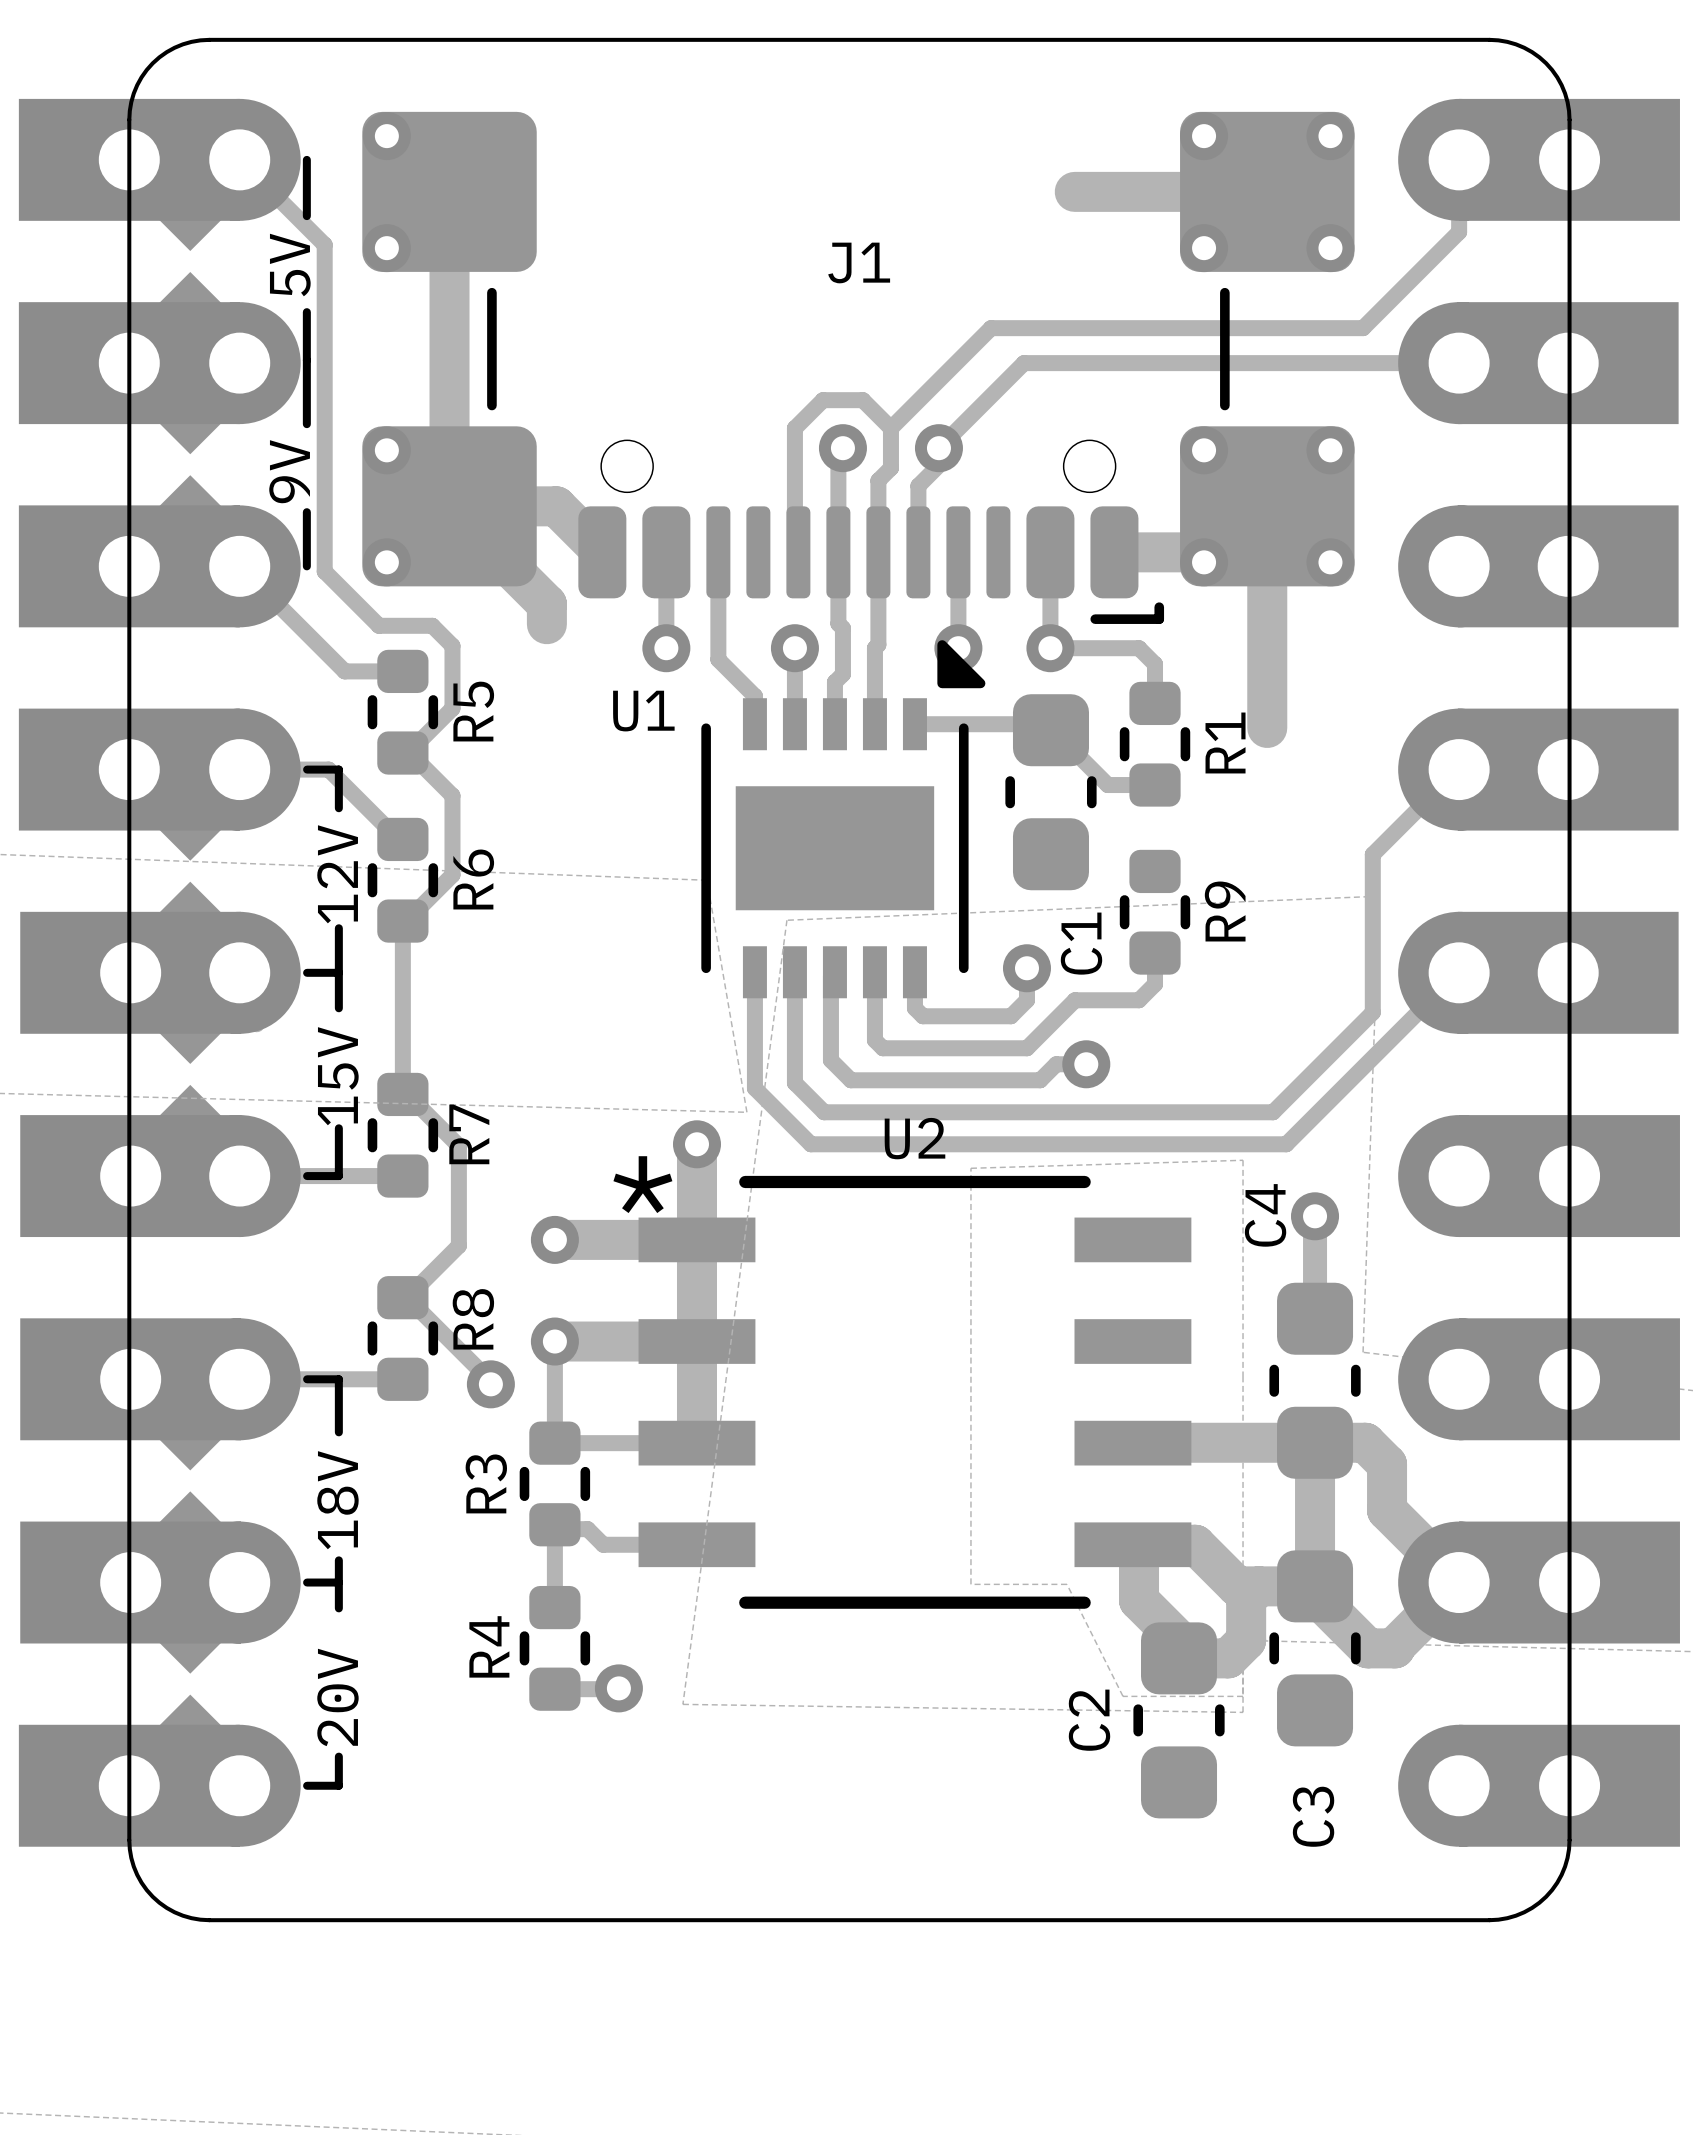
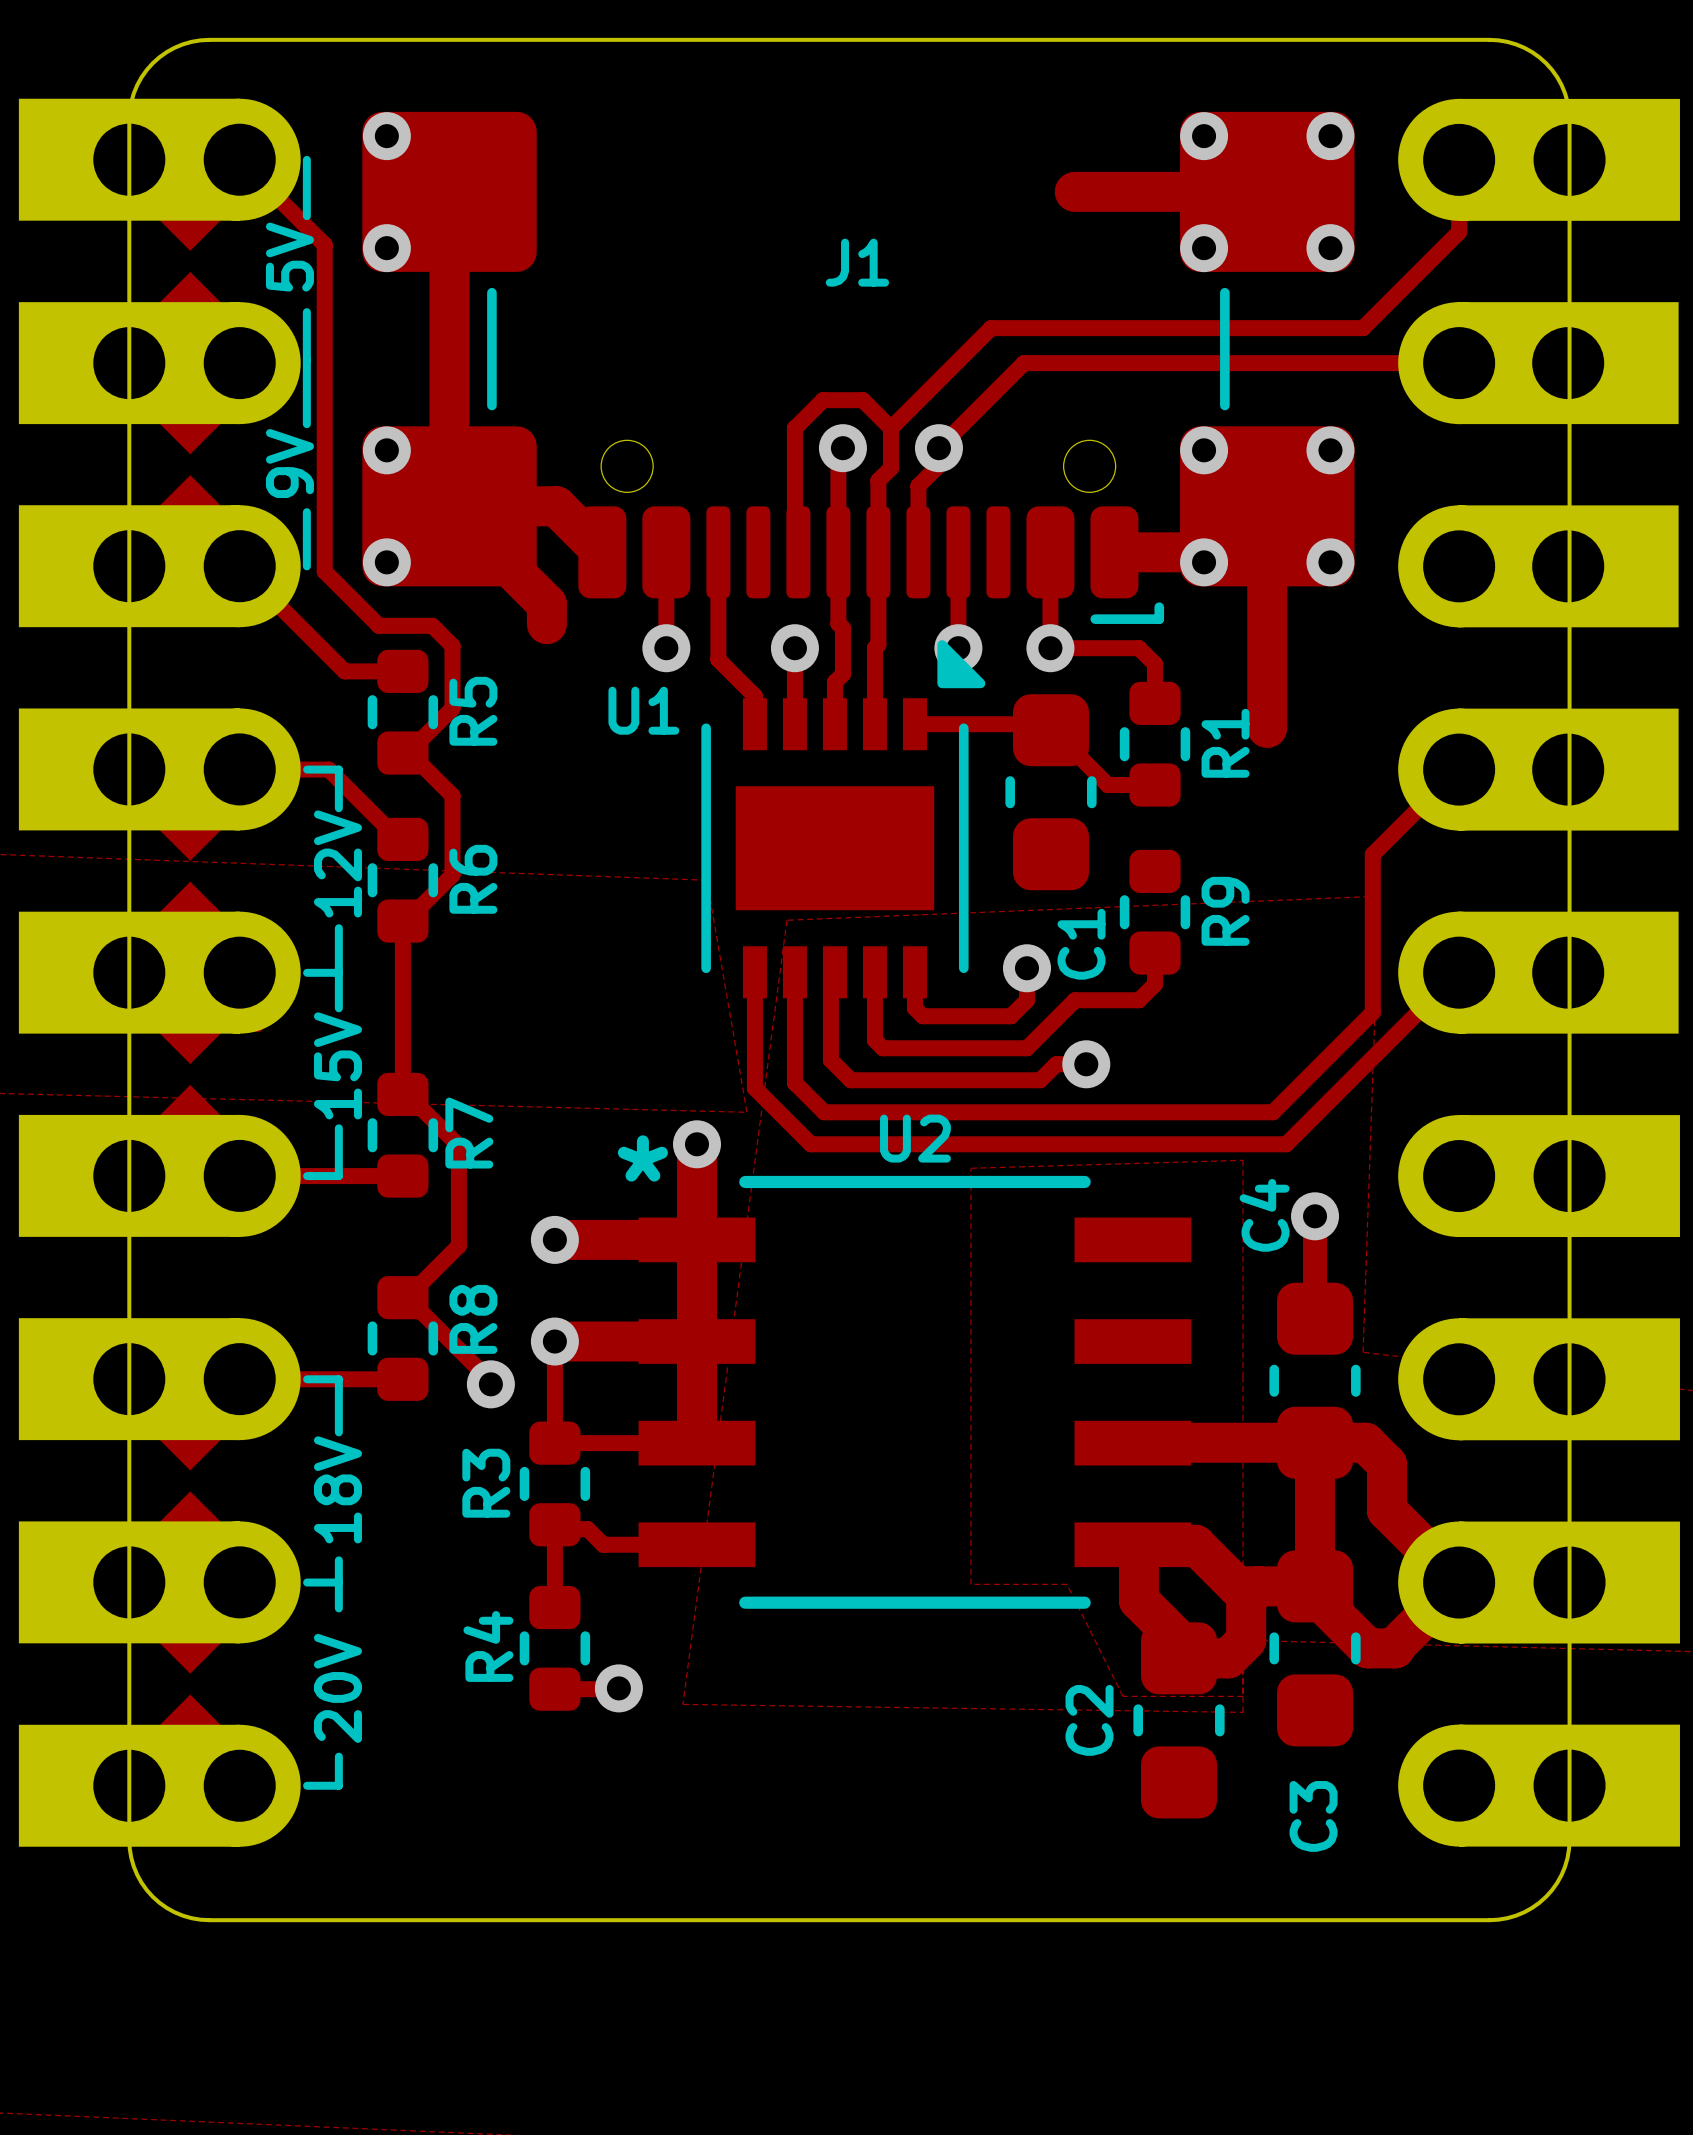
part footprint: [18, 37, 1680, 1923] -> [18, 37, 1680, 1923]

